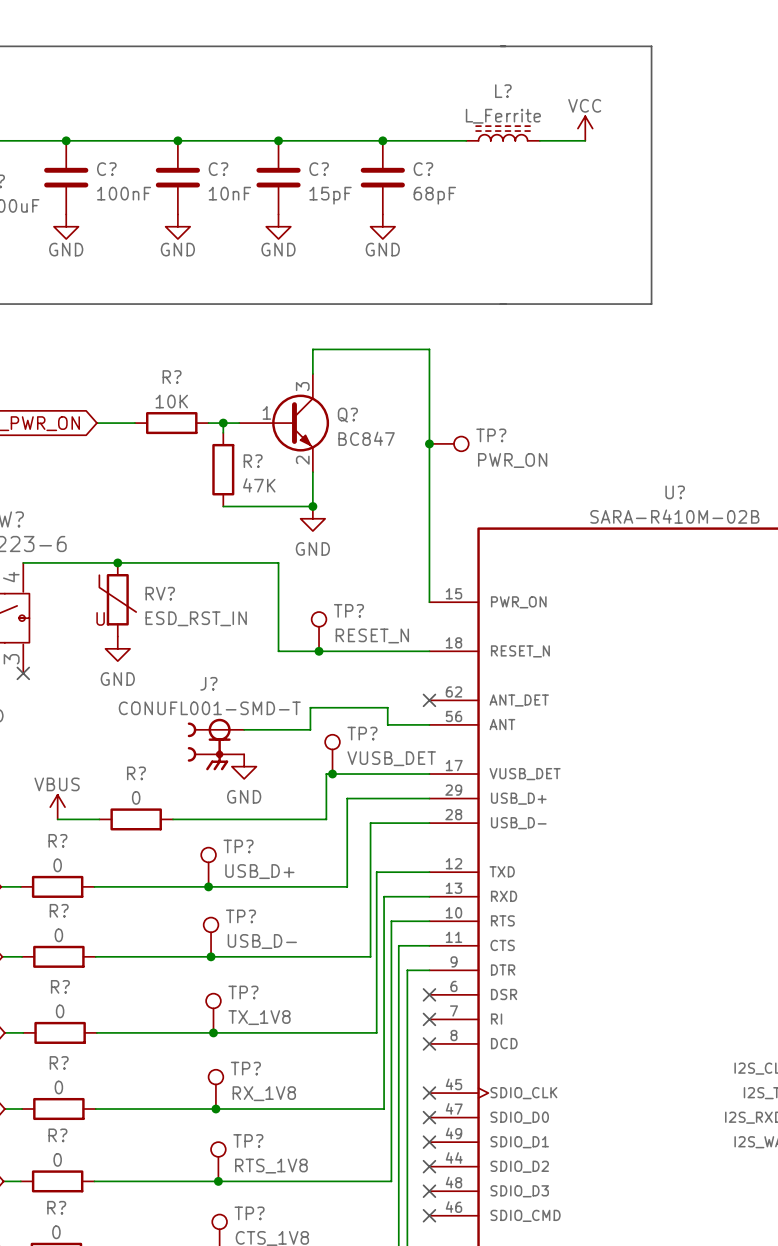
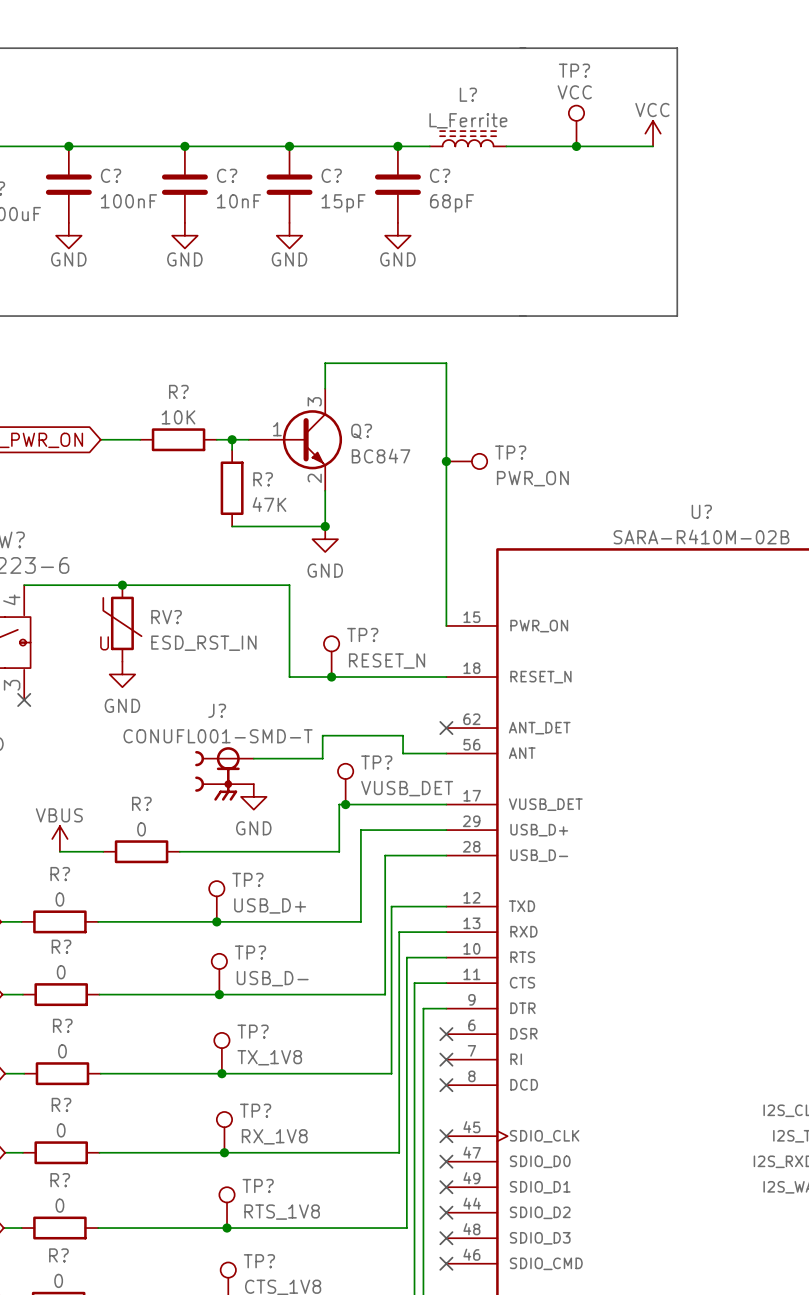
TP?: none -> VCC (576, 125)
power symbol position: VCC (585, 128) -> VCC (653, 133)
L? position: (503, 133) -> (468, 138)
wire: (413, 140) (466, 140) -> (506, 146) (561, 146)
junction: none -> (576, 146)
wire: none -> (608, 146) (653, 146)

